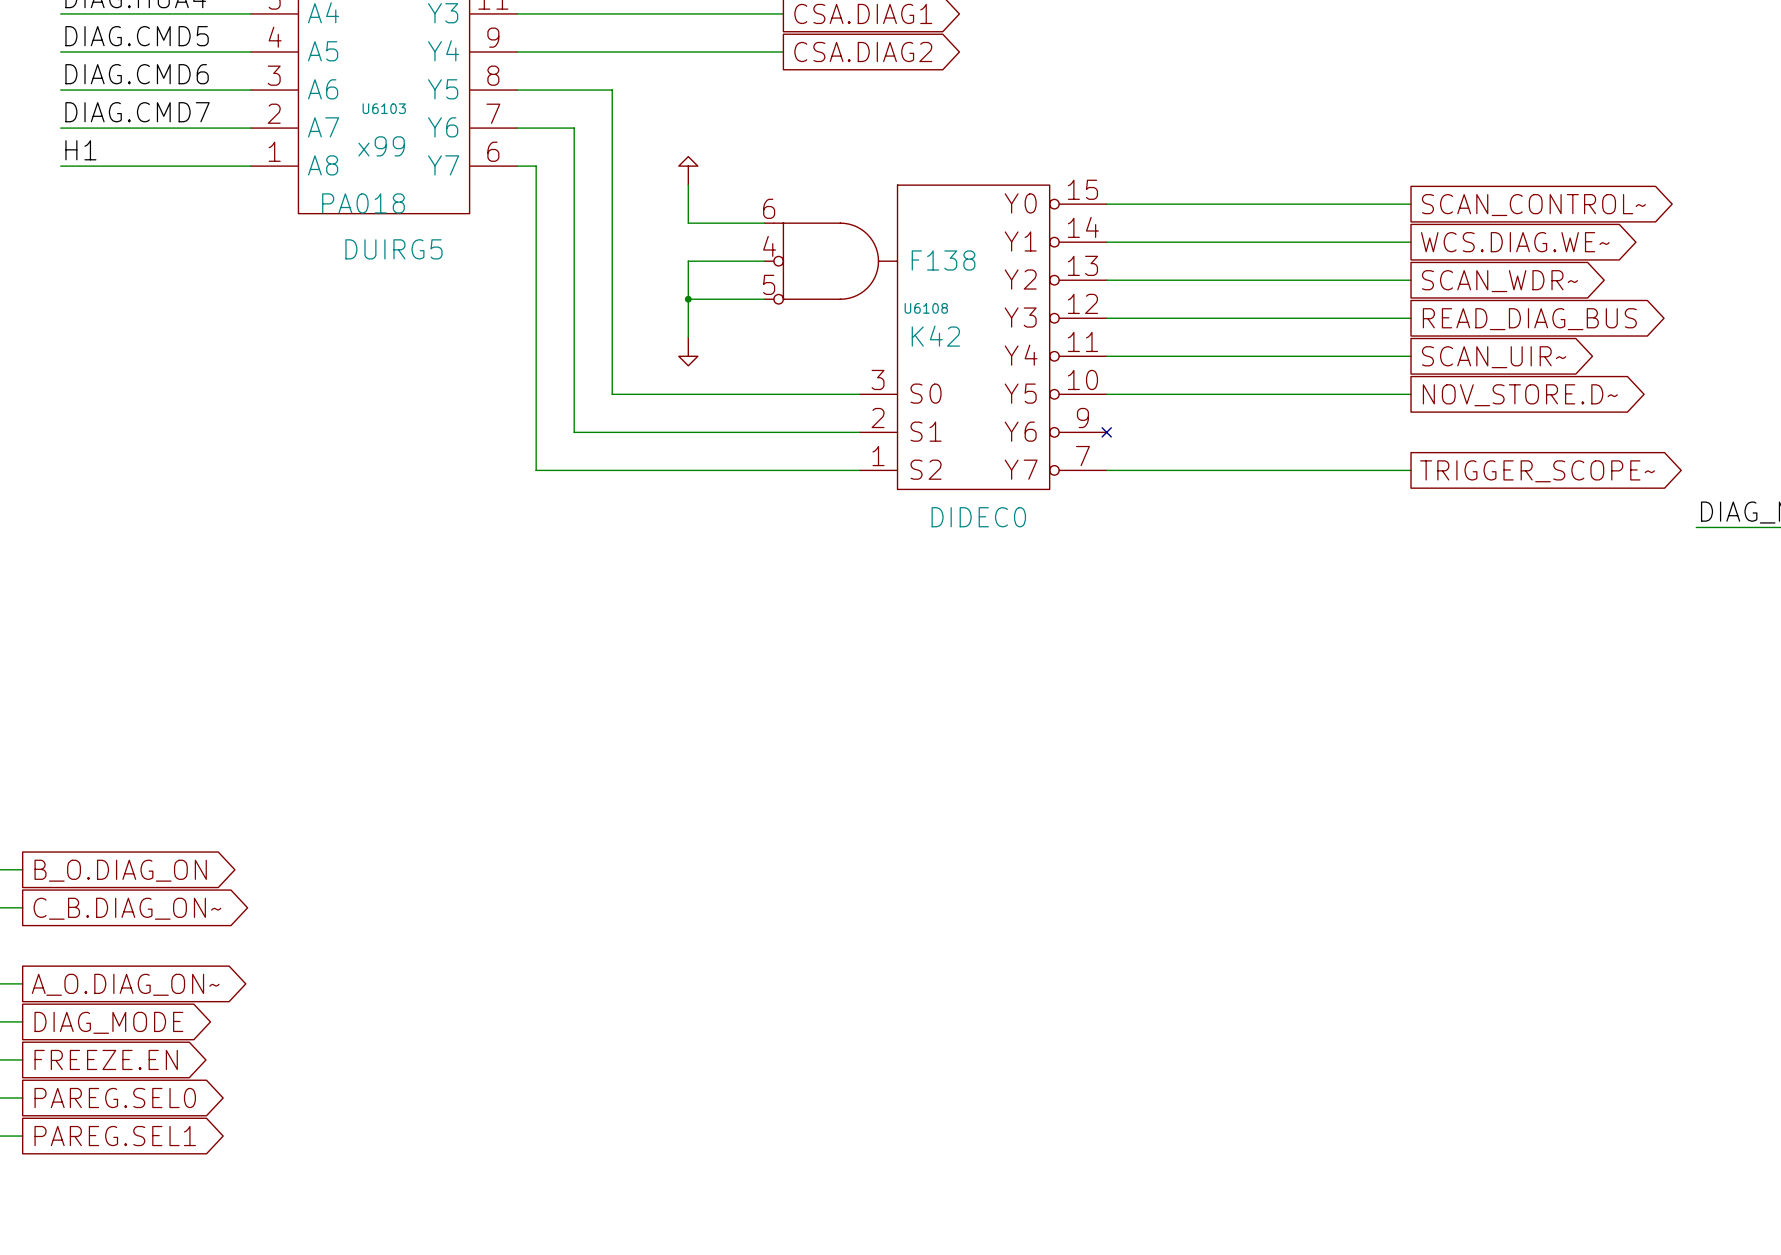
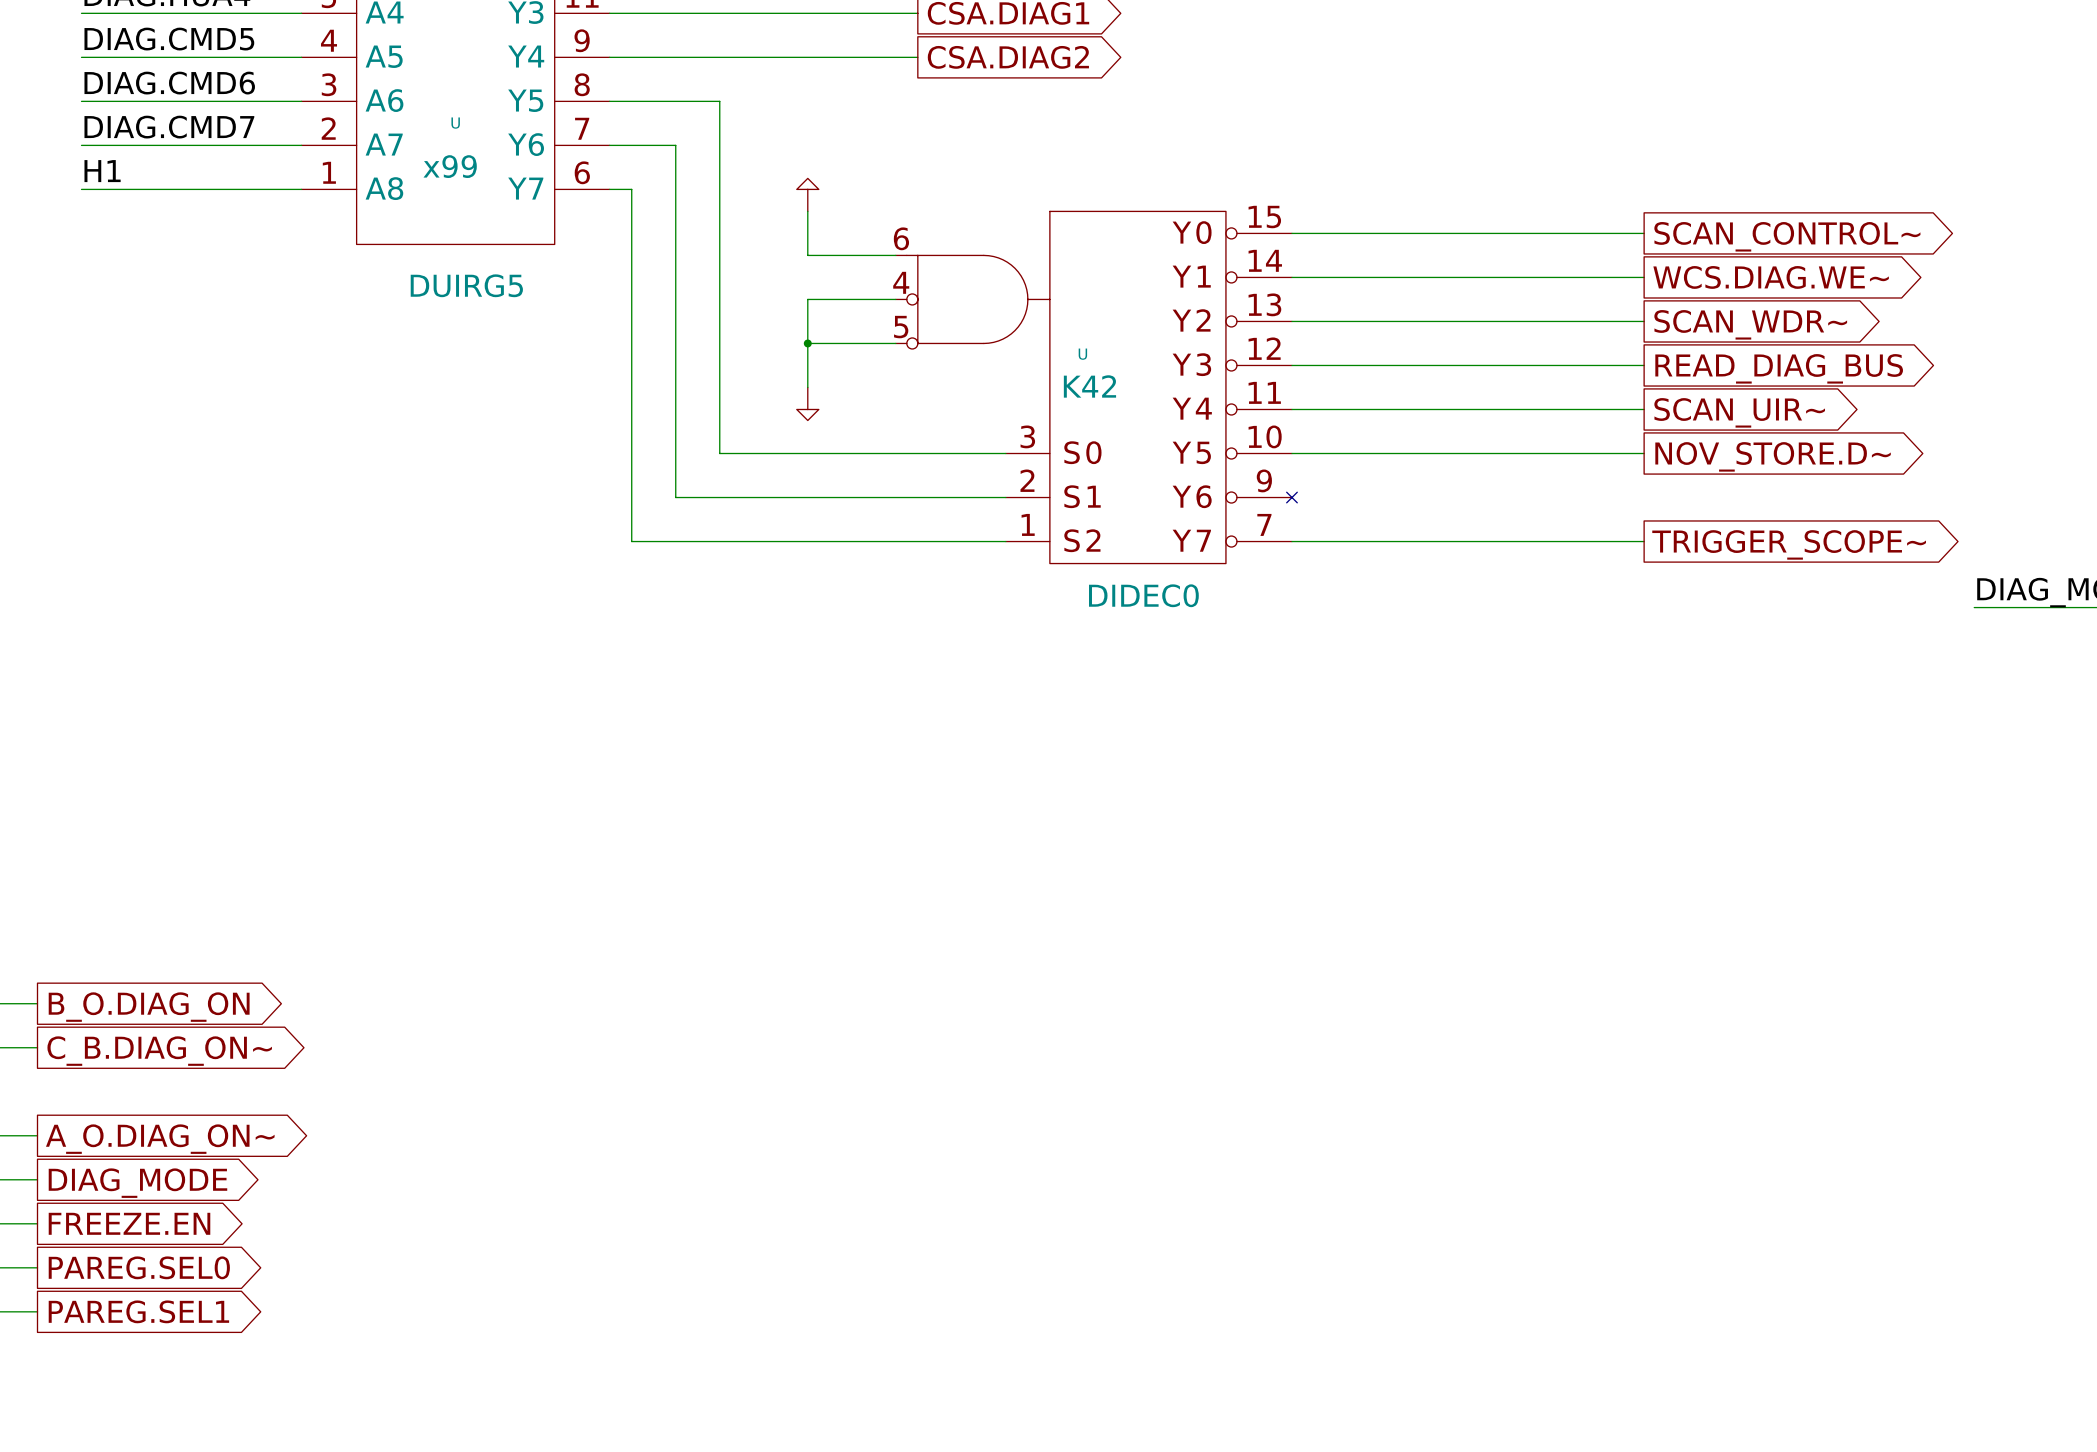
U6103 name: U6103 (384, 108) -> U (455, 123)
U6103 value: PA018 (363, 203) -> none
U6108 value: F138 (943, 260) -> none
U6108 name: U6108 (926, 308) -> U (1082, 354)

